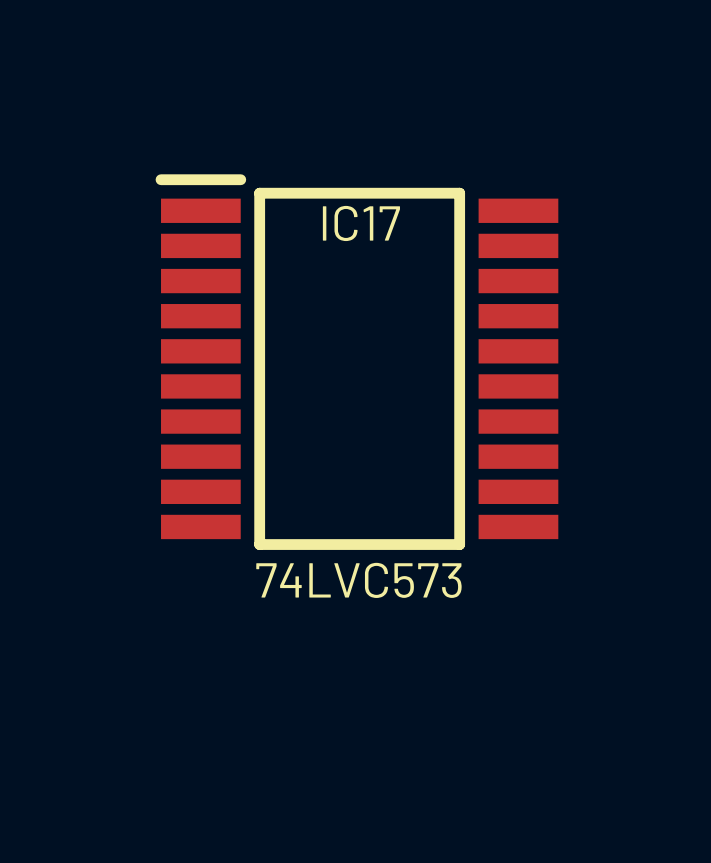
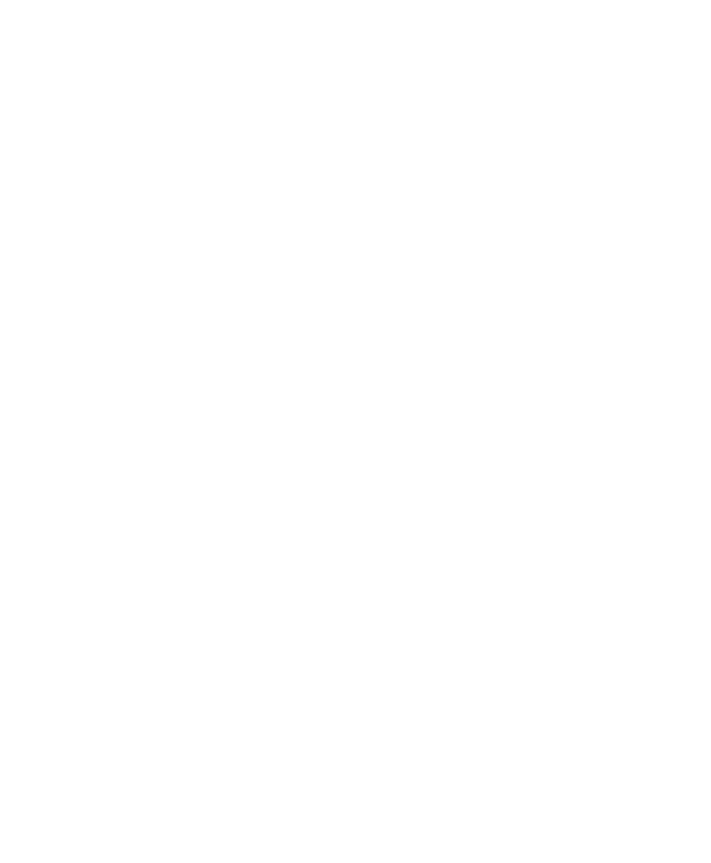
IC17: (356, 362) -> none

